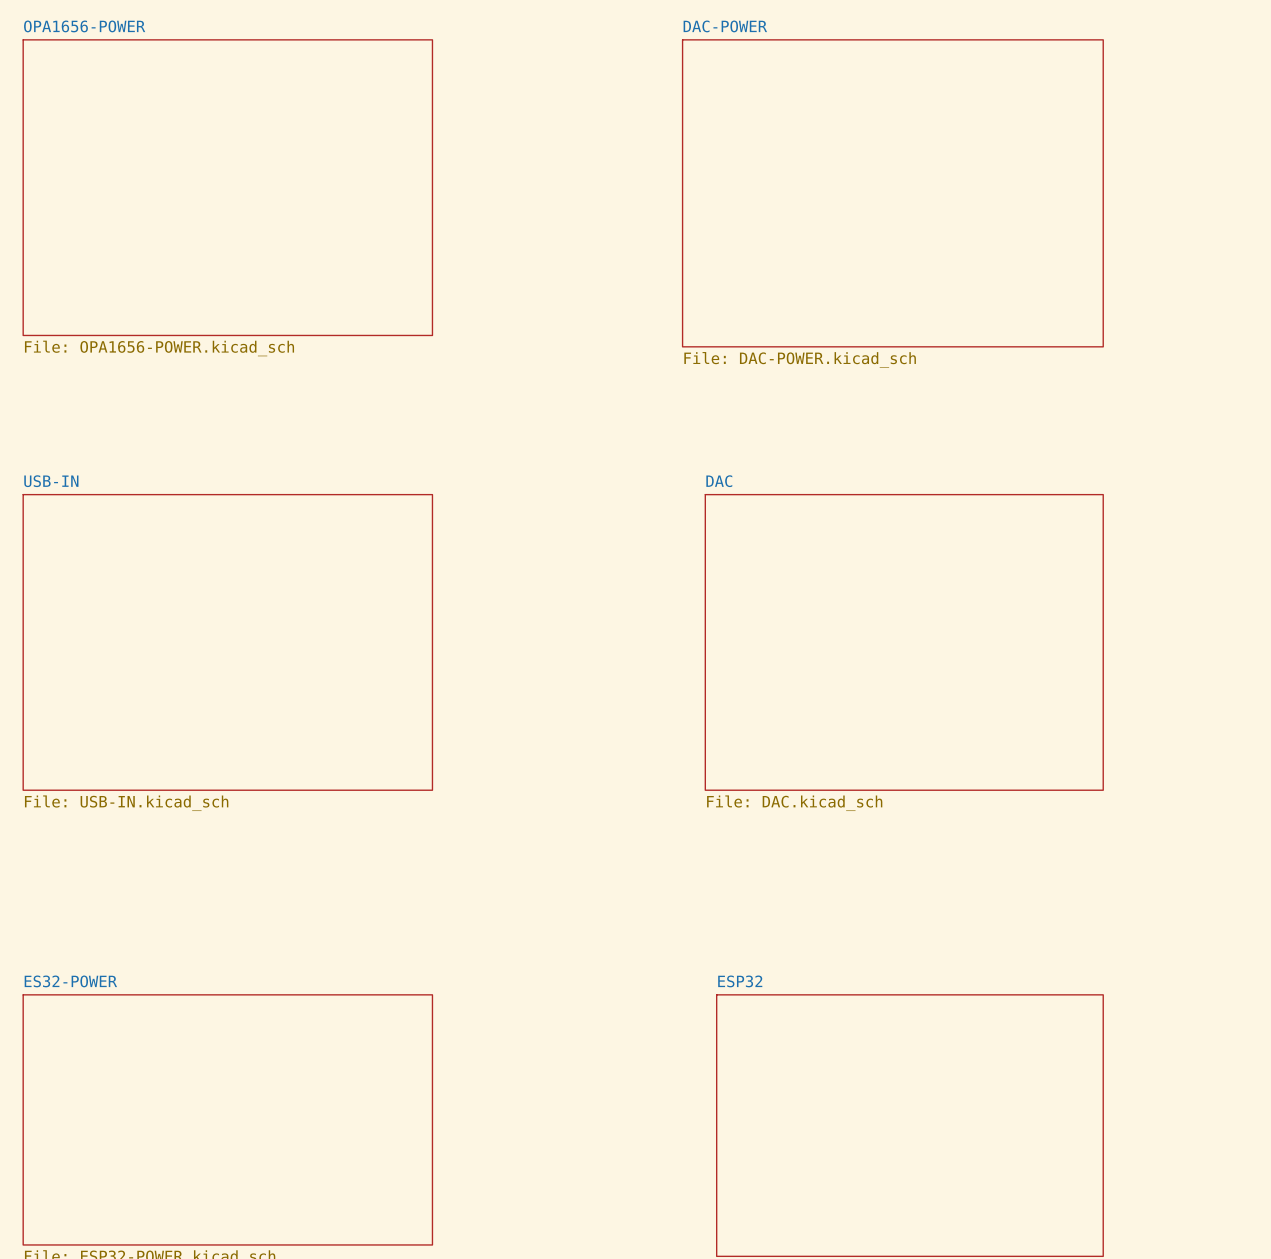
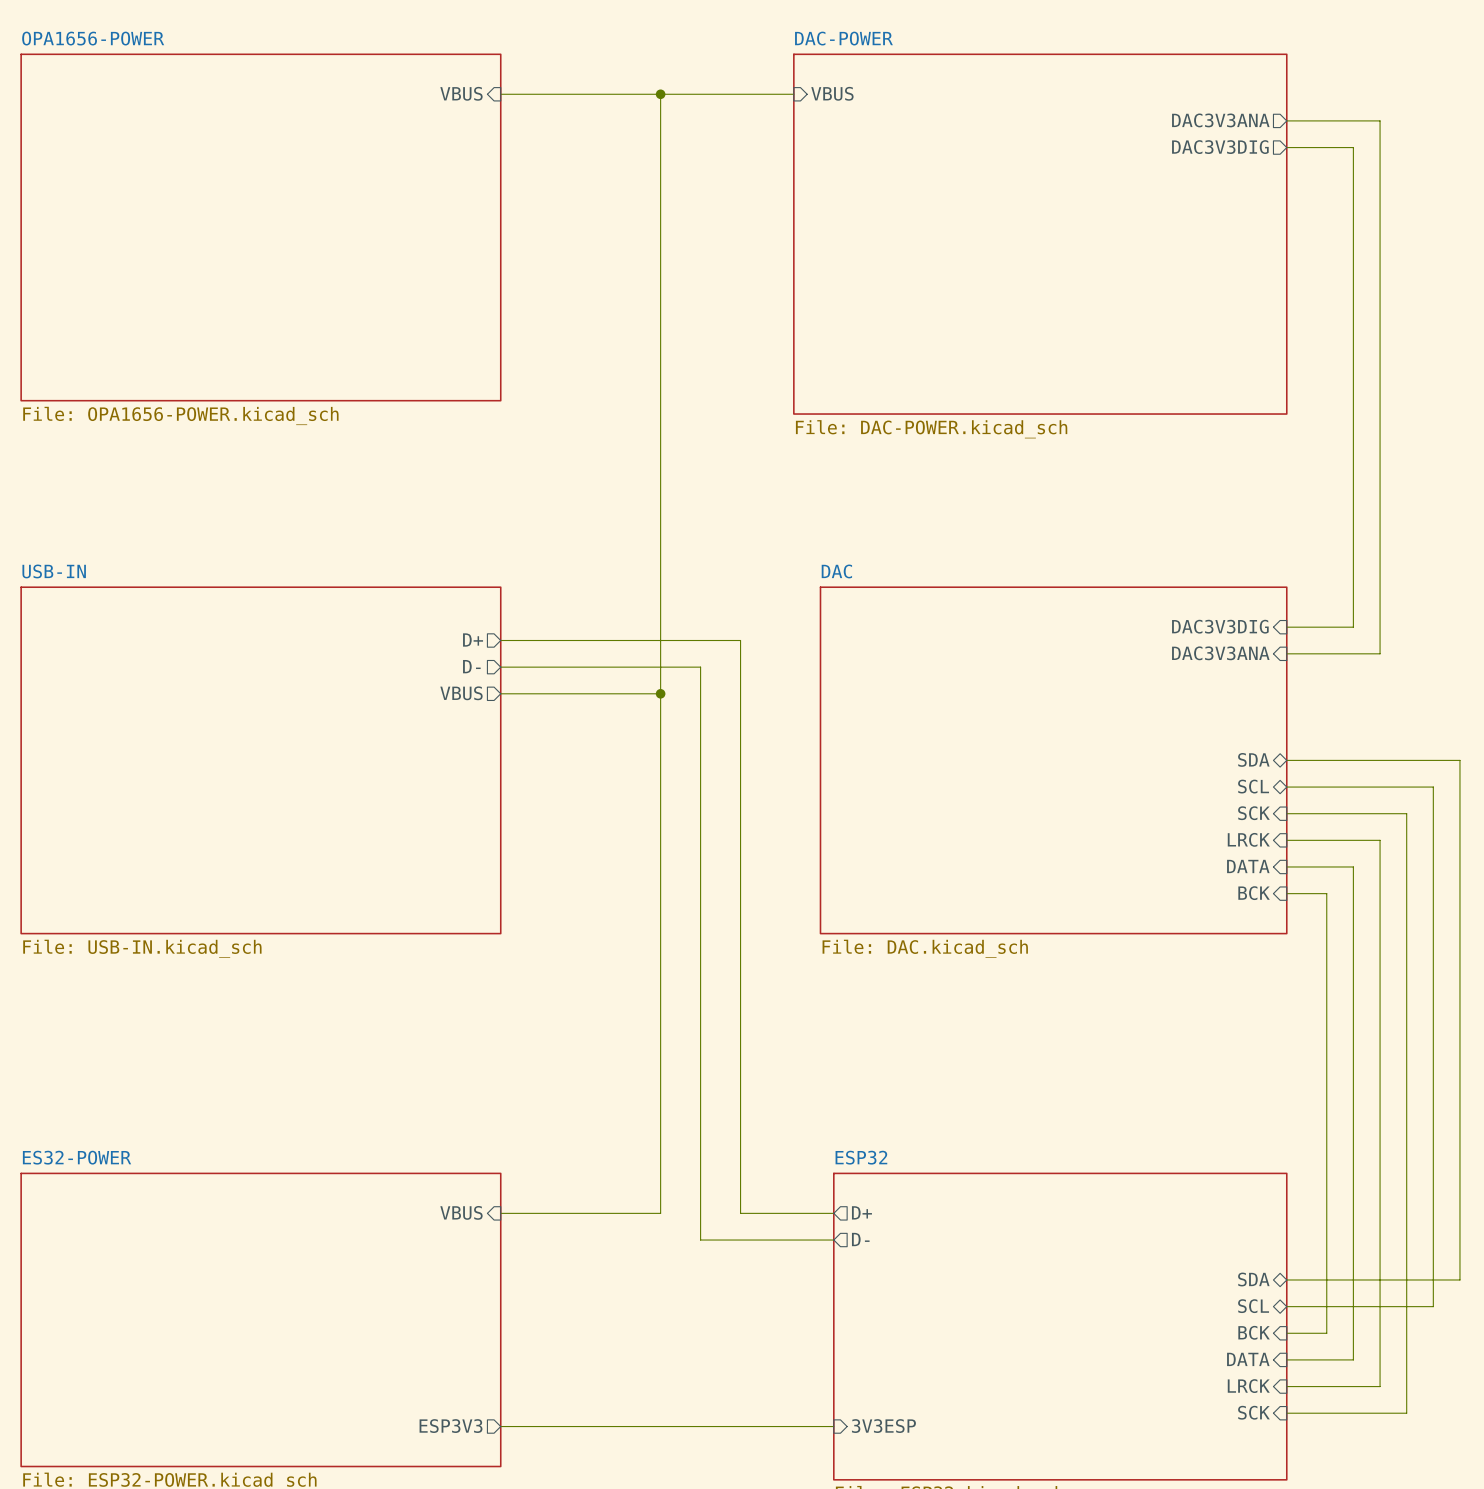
sheet pin: none -> VBUS (461, 93)
wire: none -> (500, 94) (793, 94)
wire: none -> (660, 94) (660, 1213) (500, 1213)
junction: none -> (660, 94)
sheet pin: none -> VBUS (832, 93)
sheet pin: none -> DAC3V3ANA (1220, 120)
wire: none -> (1286, 120) (1380, 120) (1380, 653) (1286, 653)
sheet pin: none -> DAC3V3DIG (1220, 147)
wire: none -> (1286, 147) (1353, 147) (1353, 627) (1286, 627)
sheet pin: none -> DAC3V3DIG (1220, 626)
sheet pin: none -> D+ (473, 640)
wire: none -> (500, 640) (740, 640) (740, 1213) (833, 1213)
sheet pin: none -> DAC3V3ANA (1220, 653)
sheet pin: none -> D- (471, 666)
wire: none -> (500, 667) (700, 667) (700, 1240) (833, 1240)
sheet pin: none -> VBUS (461, 693)
wire: none -> (500, 693) (660, 693)
junction: none -> (660, 693)
sheet pin: none -> SDA (1253, 759)
wire: none -> (1286, 760) (1459, 760) (1459, 1279) (1286, 1279)
sheet pin: none -> SCL (1253, 786)
wire: none -> (1286, 787) (1433, 787) (1433, 1306) (1286, 1306)
sheet pin: none -> SCK (1253, 813)
wire: none -> (1286, 813) (1406, 813) (1406, 1413) (1286, 1413)
sheet pin: none -> LRCK (1248, 839)
wire: none -> (1286, 840) (1380, 840) (1380, 1386) (1286, 1386)
sheet pin: none -> DATA (1248, 866)
wire: none -> (1286, 866) (1353, 866) (1353, 1359) (1286, 1359)
sheet pin: none -> BCK (1254, 893)
wire: none -> (1286, 893) (1326, 893) (1326, 1333) (1286, 1333)
sheet pin: none -> VBUS (461, 1212)
sheet pin: none -> D+ (861, 1212)
sheet pin: none -> D- (860, 1239)
sheet pin: none -> SDA (1253, 1279)
sheet pin: none -> SCL (1253, 1306)
sheet pin: none -> BCK (1254, 1332)
sheet pin: none -> DATA (1248, 1359)
sheet pin: none -> LRCK (1248, 1386)
sheet pin: none -> SCK (1253, 1412)
sheet pin: none -> ESP3V3 (451, 1426)
wire: none -> (500, 1426) (833, 1426)
sheet pin: none -> 3V3ESP (883, 1426)

